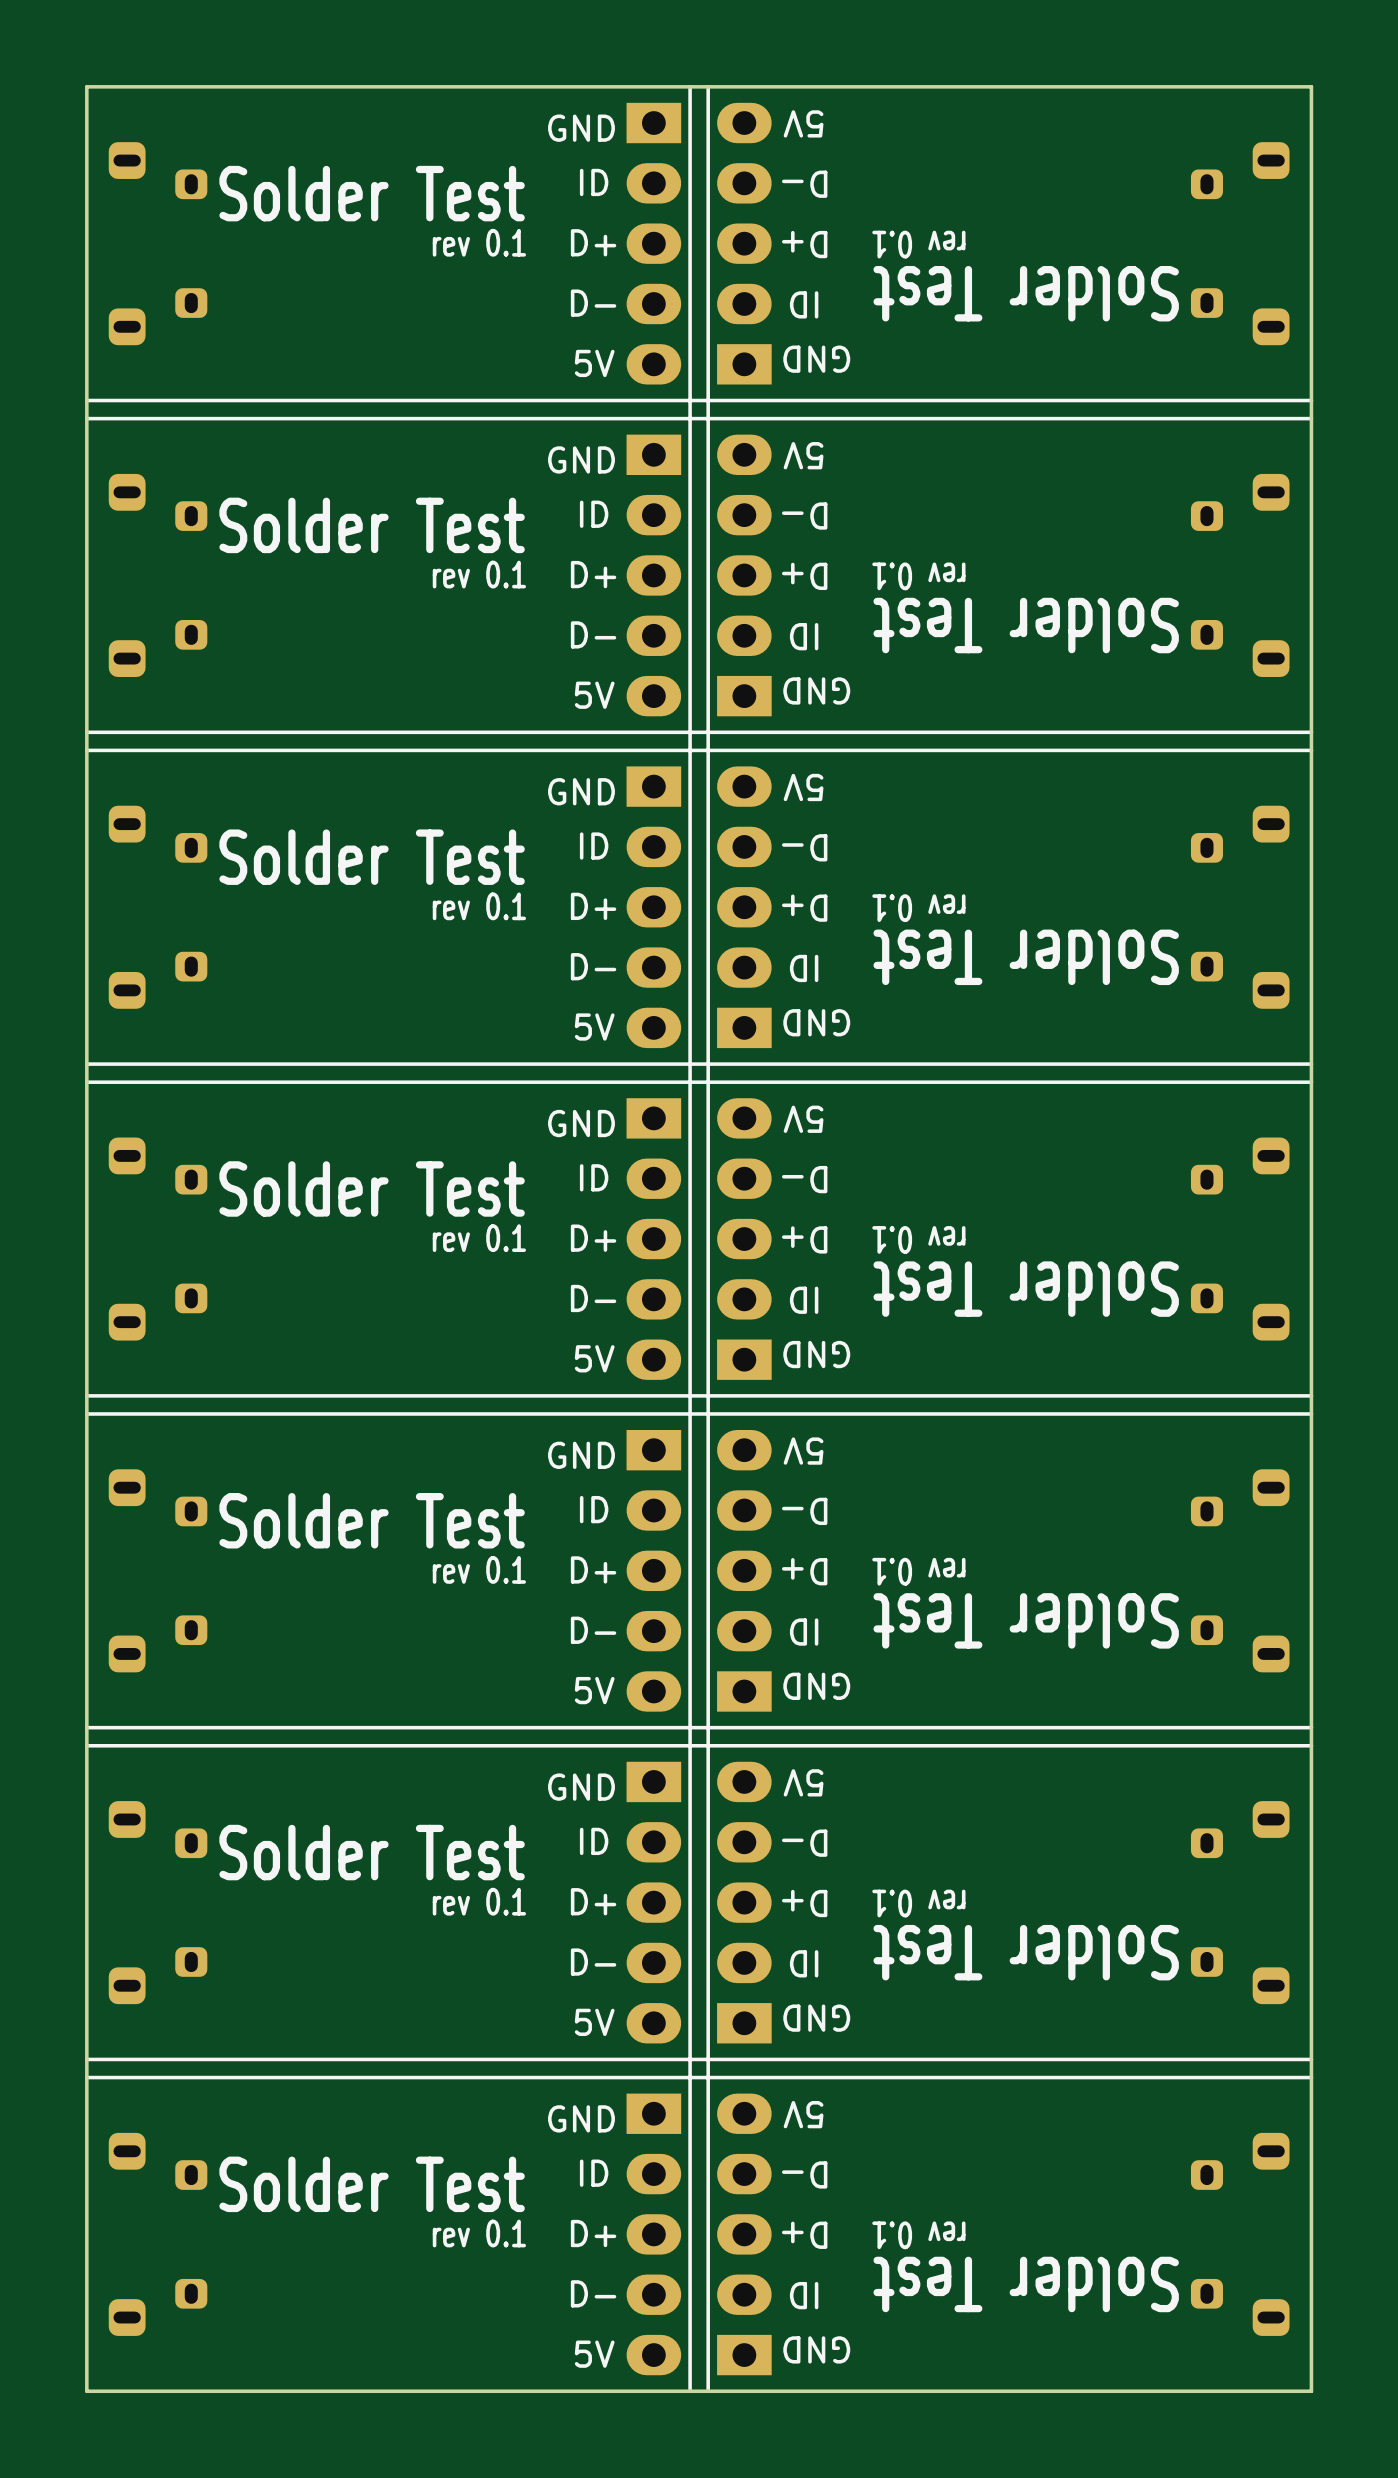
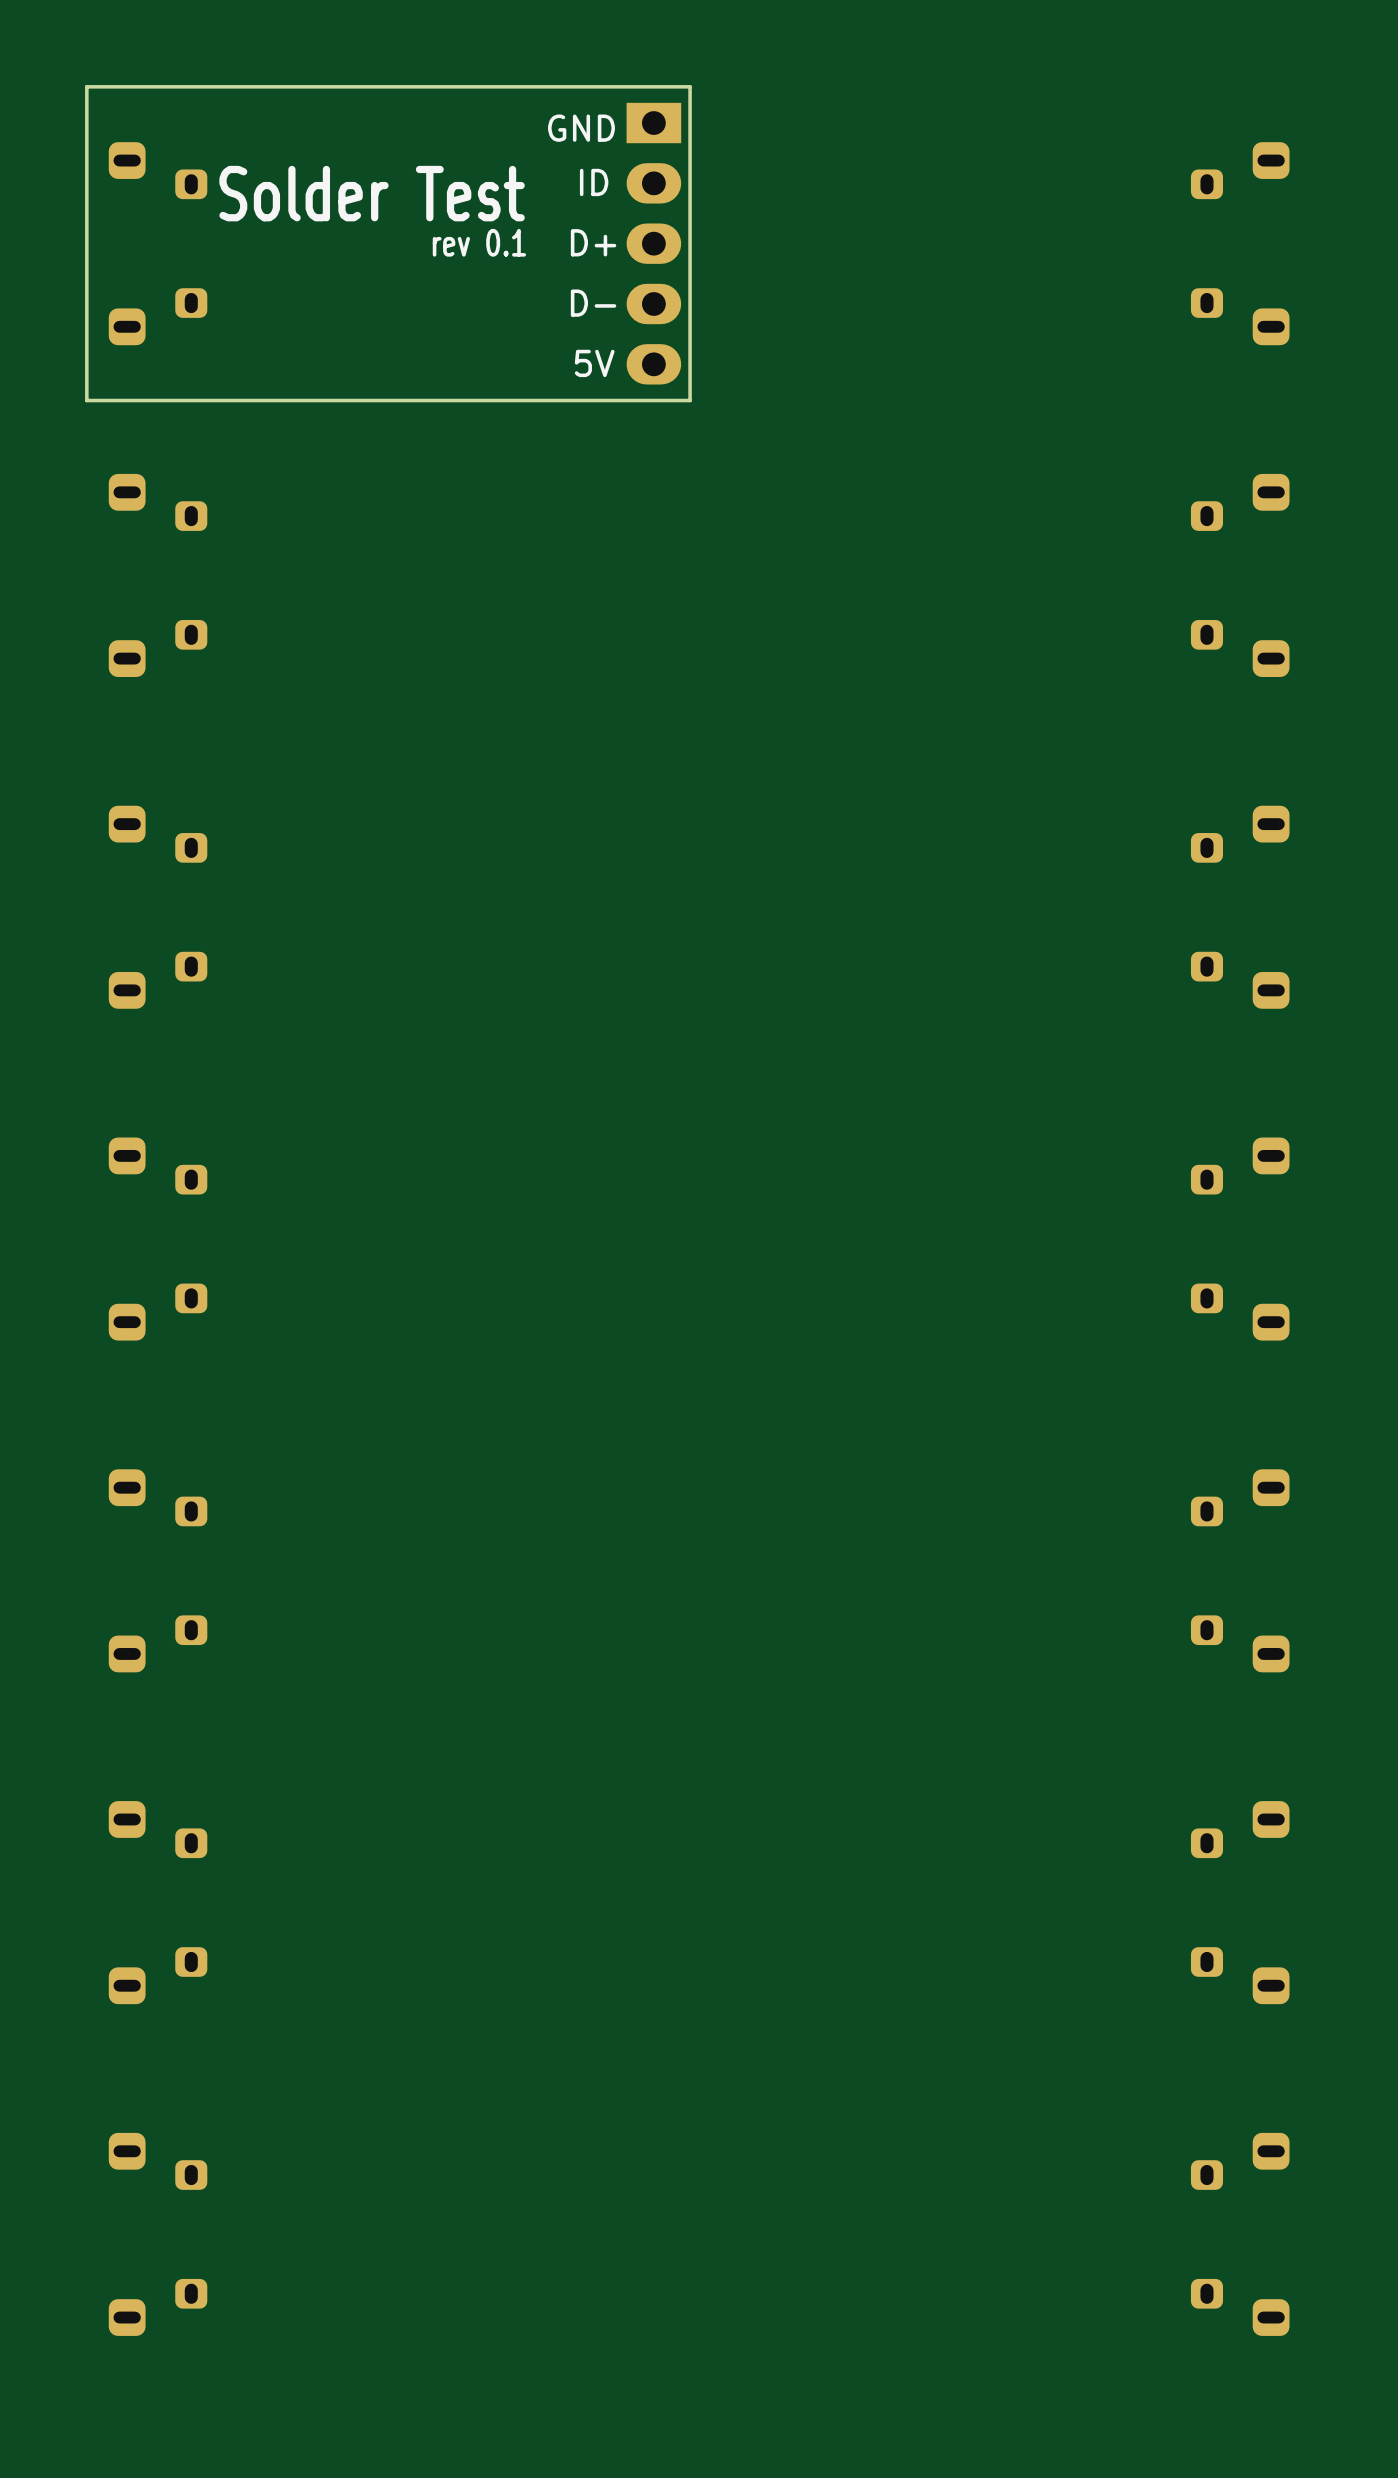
board edge: (690, 86) (1311, 86) (1311, 2391) (86, 2391) (86, 400) -> (690, 86) (690, 400) (86, 400)
line: (690, 86) (690, 2391) -> none
line: (708, 86) (708, 2391) -> none
text: 5V (803, 123) -> none
text: D- (804, 184) -> none
part: (744, 243) -> none
text: D+ (804, 244) -> none
text: rev 0.1 (918, 244) -> none
text: Solder Test (1026, 293) -> none
text: ID (804, 304) -> none
text: GND (816, 359) -> none
line: (1311, 400) (86, 400) -> none
line: (1311, 418) (86, 418) -> none
text: 5V (803, 455) -> none
text: GND (581, 459) -> none
text: ID (594, 514) -> none
text: D- (804, 516) -> none
text: Solder Test (372, 525) -> none
text: rev 0.1 (479, 574) -> none
text: D+ (593, 574) -> none
part: (653, 575) -> none
part: (744, 575) -> none
text: D+ (804, 576) -> none
text: rev 0.1 (918, 576) -> none
text: Solder Test (1026, 625) -> none
text: D- (593, 634) -> none
text: ID (804, 636) -> none
text: GND (816, 690) -> none
text: 5V (594, 695) -> none
line: (1311, 732) (86, 732) -> none
line: (1311, 750) (86, 750) -> none
text: 5V (803, 787) -> none
text: GND (581, 791) -> none
text: ID (594, 846) -> none
text: D- (804, 847) -> none
text: Solder Test (372, 857) -> none
text: rev 0.1 (479, 906) -> none
text: D+ (593, 906) -> none
part: (653, 907) -> none
part: (744, 907) -> none
text: D+ (804, 908) -> none
text: rev 0.1 (918, 908) -> none
text: Solder Test (1026, 957) -> none
text: D- (593, 966) -> none
text: ID (804, 968) -> none
text: GND (816, 1022) -> none
text: 5V (594, 1027) -> none
line: (1311, 1064) (86, 1064) -> none
line: (1311, 1082) (86, 1082) -> none
text: 5V (803, 1119) -> none
text: GND (581, 1123) -> none
text: ID (594, 1177) -> none
text: D- (804, 1179) -> none
text: Solder Test (372, 1188) -> none
text: rev 0.1 (479, 1238) -> none
text: D+ (593, 1238) -> none
part: (653, 1239) -> none
part: (744, 1239) -> none
text: D+ (804, 1239) -> none
text: rev 0.1 (918, 1239) -> none
text: Solder Test (1026, 1289) -> none
text: D- (593, 1298) -> none
text: ID (804, 1300) -> none
text: GND (816, 1354) -> none
text: 5V (594, 1358) -> none
line: (1311, 1395) (86, 1395) -> none
line: (1311, 1413) (86, 1413) -> none
text: 5V (803, 1451) -> none
text: GND (581, 1455) -> none
text: ID (594, 1509) -> none
text: D- (804, 1511) -> none
text: Solder Test (372, 1520) -> none
text: rev 0.1 (479, 1569) -> none
text: D+ (593, 1569) -> none
part: (653, 1570) -> none
part: (744, 1570) -> none
text: D+ (804, 1571) -> none
text: rev 0.1 (918, 1571) -> none
text: Solder Test (1026, 1620) -> none
text: D- (593, 1630) -> none
text: ID (804, 1632) -> none
text: GND (816, 1686) -> none
text: 5V (594, 1690) -> none
line: (1311, 1727) (86, 1727) -> none
line: (1311, 1745) (86, 1745) -> none
text: 5V (803, 1782) -> none
text: GND (581, 1787) -> none
text: ID (594, 1841) -> none
text: D- (804, 1843) -> none
text: Solder Test (372, 1852) -> none
text: rev 0.1 (479, 1901) -> none
text: D+ (593, 1901) -> none
part: (653, 1902) -> none
part: (744, 1902) -> none
text: D+ (804, 1903) -> none
text: rev 0.1 (918, 1903) -> none
text: Solder Test (1026, 1952) -> none
text: D- (593, 1962) -> none
text: ID (804, 1963) -> none
text: GND (816, 2018) -> none
text: 5V (594, 2022) -> none
line: (1311, 2059) (86, 2059) -> none
line: (1311, 2077) (86, 2077) -> none
text: 5V (803, 2114) -> none
text: GND (581, 2118) -> none
text: ID (594, 2173) -> none
text: D- (804, 2174) -> none
text: Solder Test (372, 2184) -> none
text: rev 0.1 (479, 2233) -> none
text: D+ (593, 2233) -> none
part: (653, 2234) -> none
part: (744, 2234) -> none
text: D+ (804, 2235) -> none
text: rev 0.1 (918, 2235) -> none
text: Solder Test (1026, 2284) -> none
text: D- (593, 2293) -> none
text: ID (804, 2295) -> none
text: GND (816, 2349) -> none
text: 5V (594, 2354) -> none

